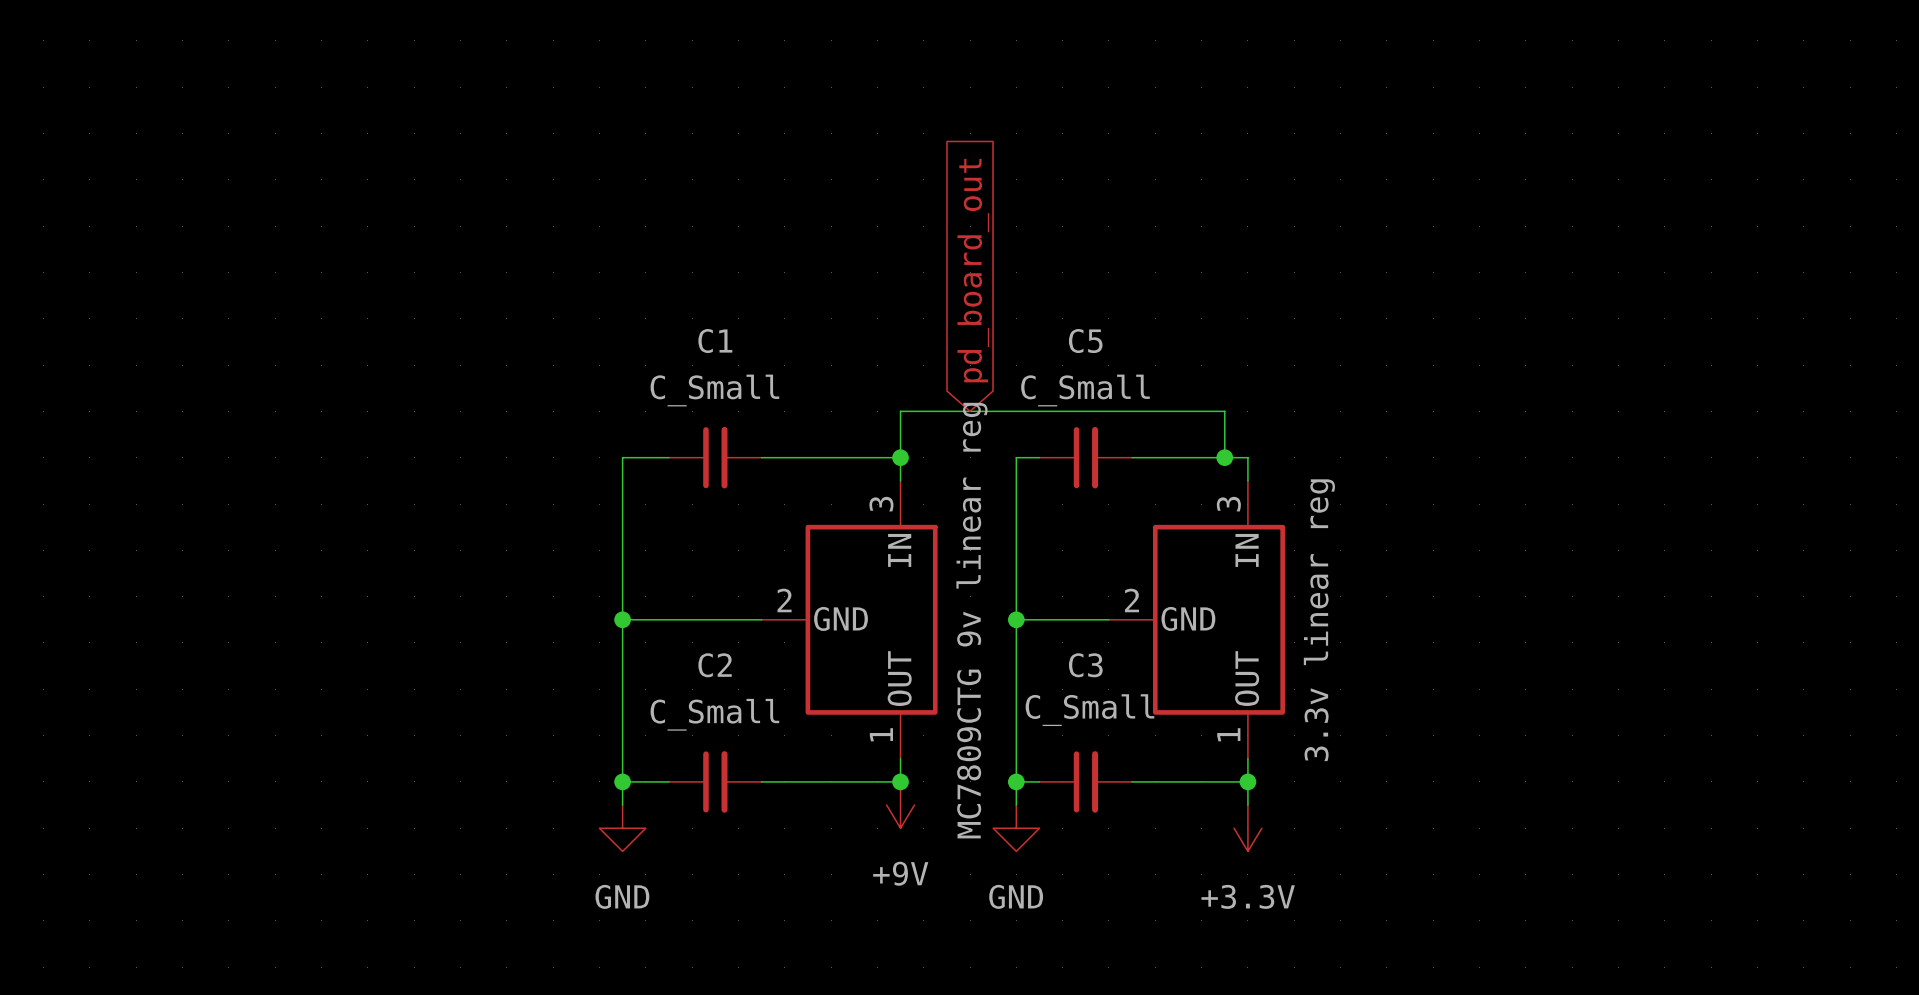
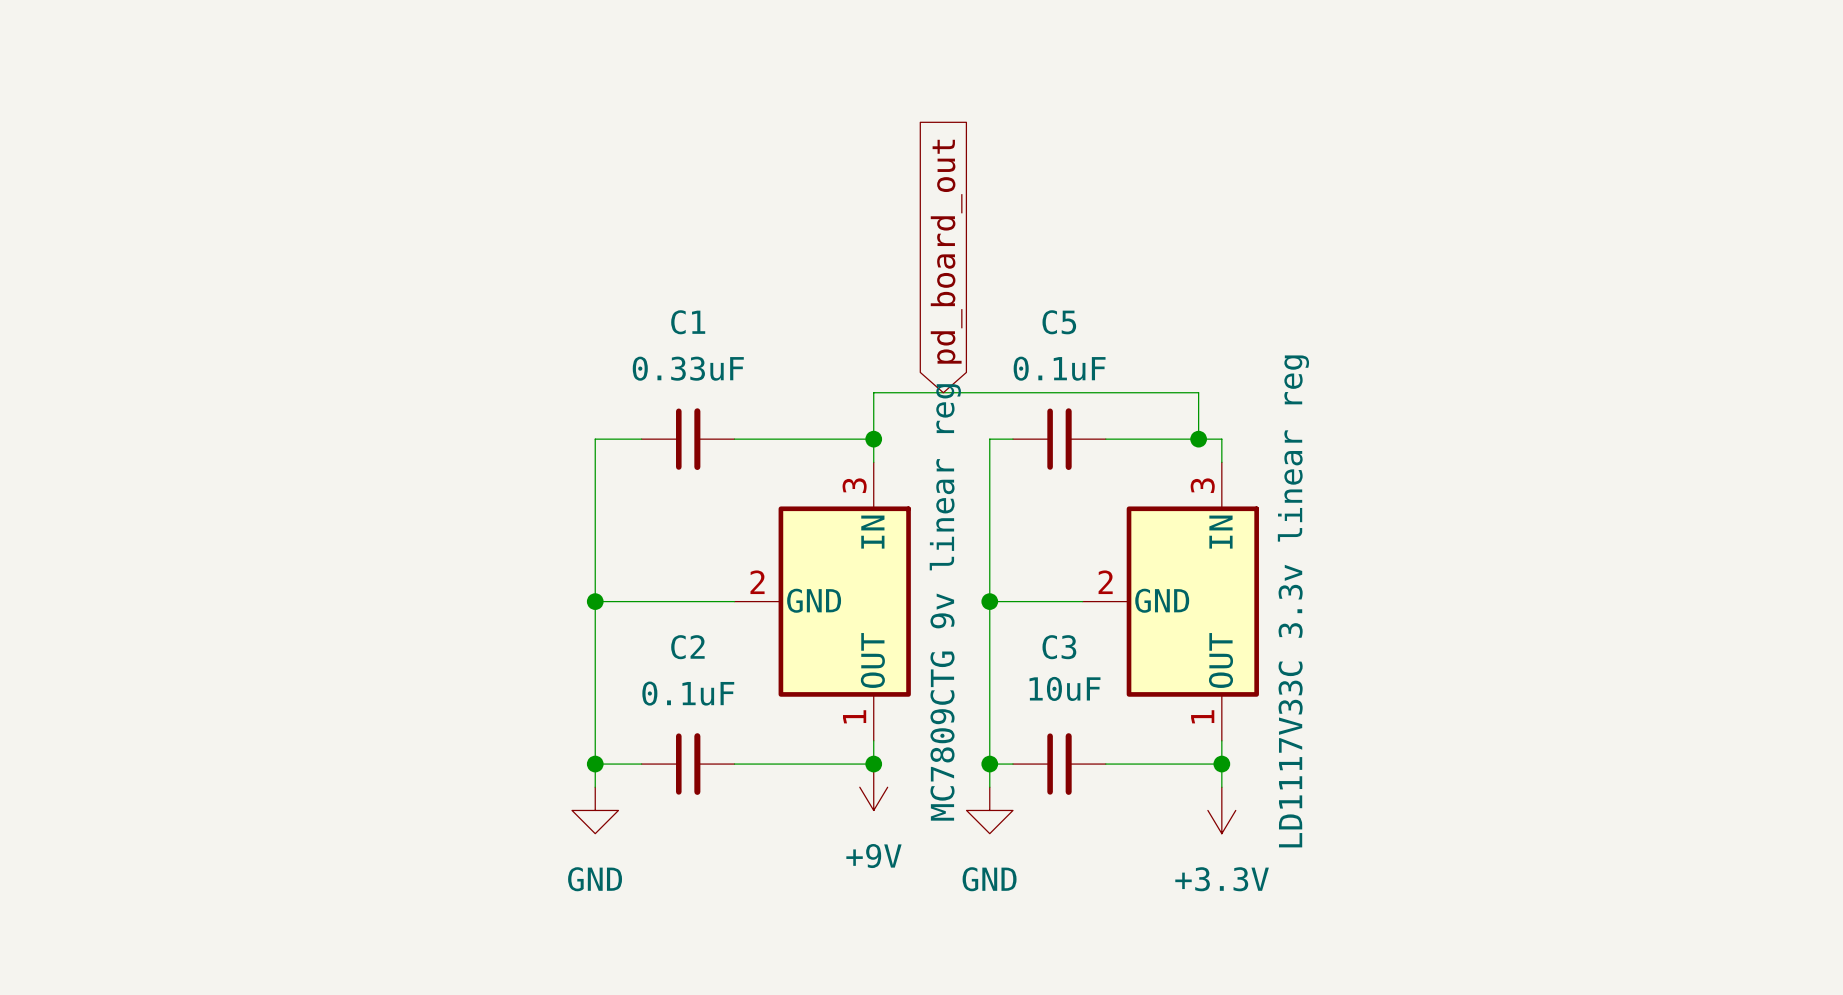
C1 value: C_Small (714, 390) -> 0.33uF (688, 368)
C5 value: C_Small (1085, 390) -> 0.1uF (1059, 368)
part value: 3.3v linear reg (1319, 620) -> LD1117V33C 3.3v linear reg (1293, 601)
C3 value: C_Small (1089, 710) -> 10uF (1065, 688)
C2 value: C_Small (714, 714) -> 0.1uF (688, 693)

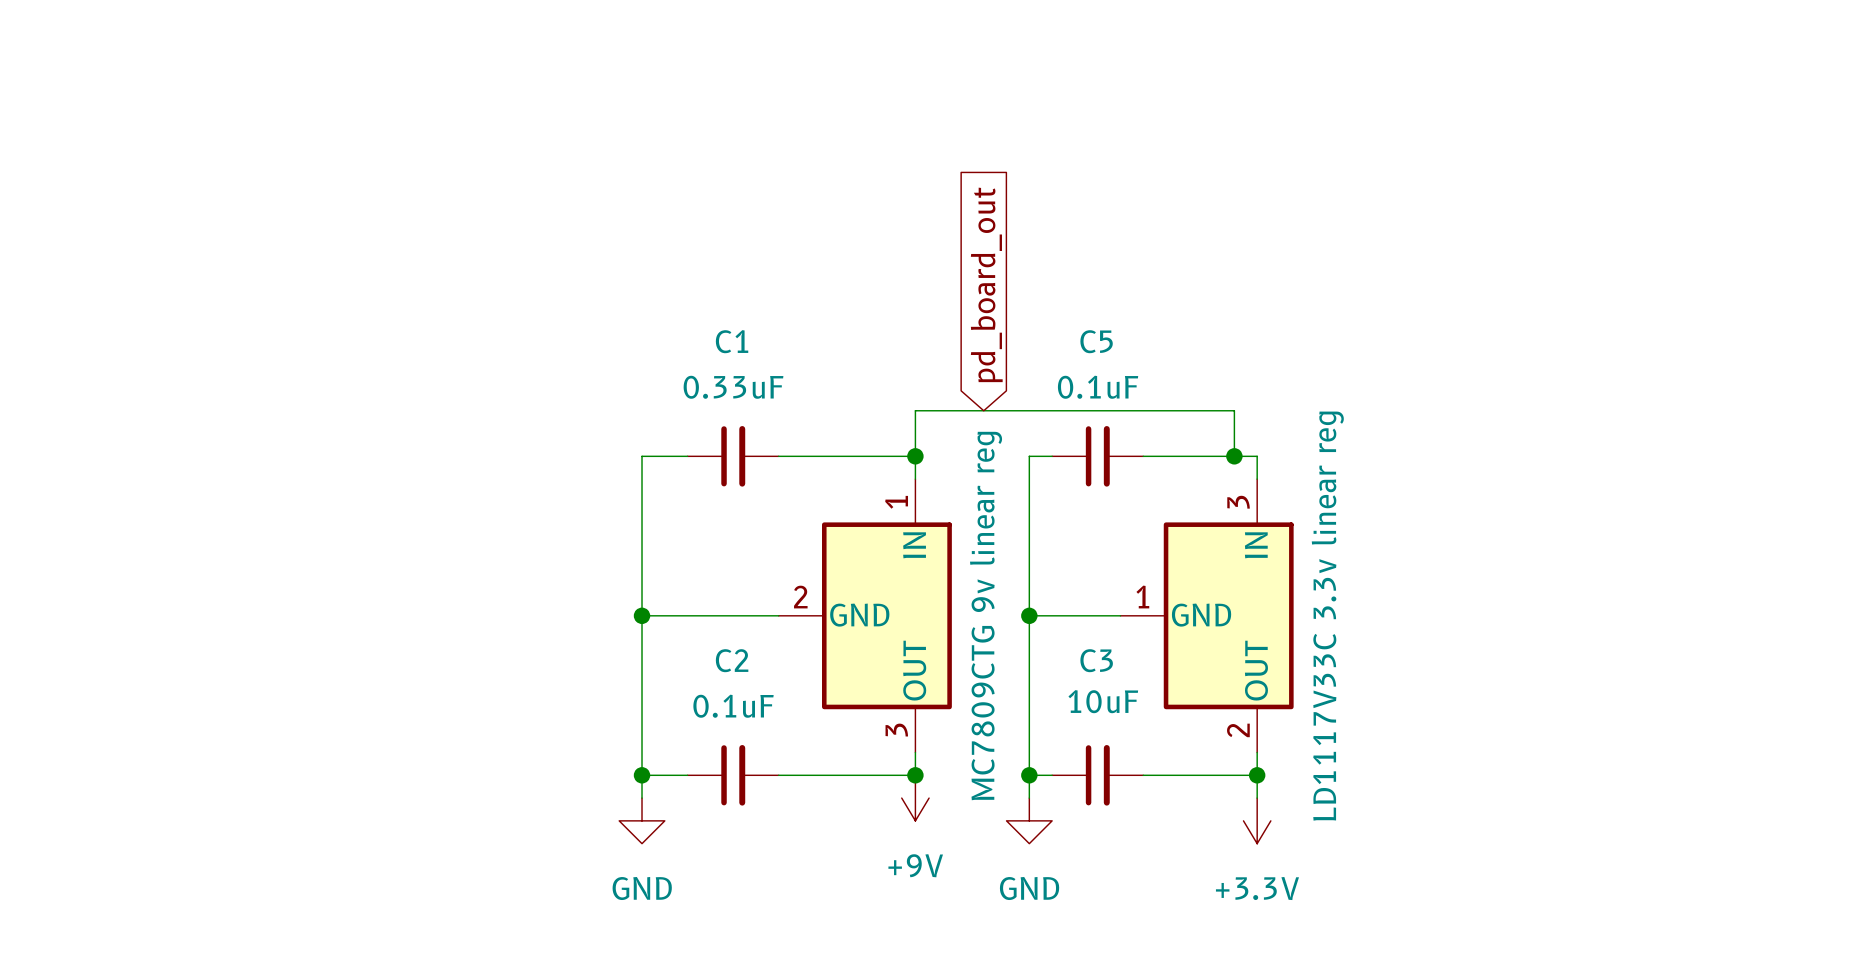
part pin number: 3 (854, 485) -> 1 (896, 502)
part pin number: 2 (1105, 582) -> 1 (1142, 597)
part pin number: 1 (854, 716) -> 3 (896, 730)
part pin number: 1 (1202, 716) -> 2 (1238, 730)

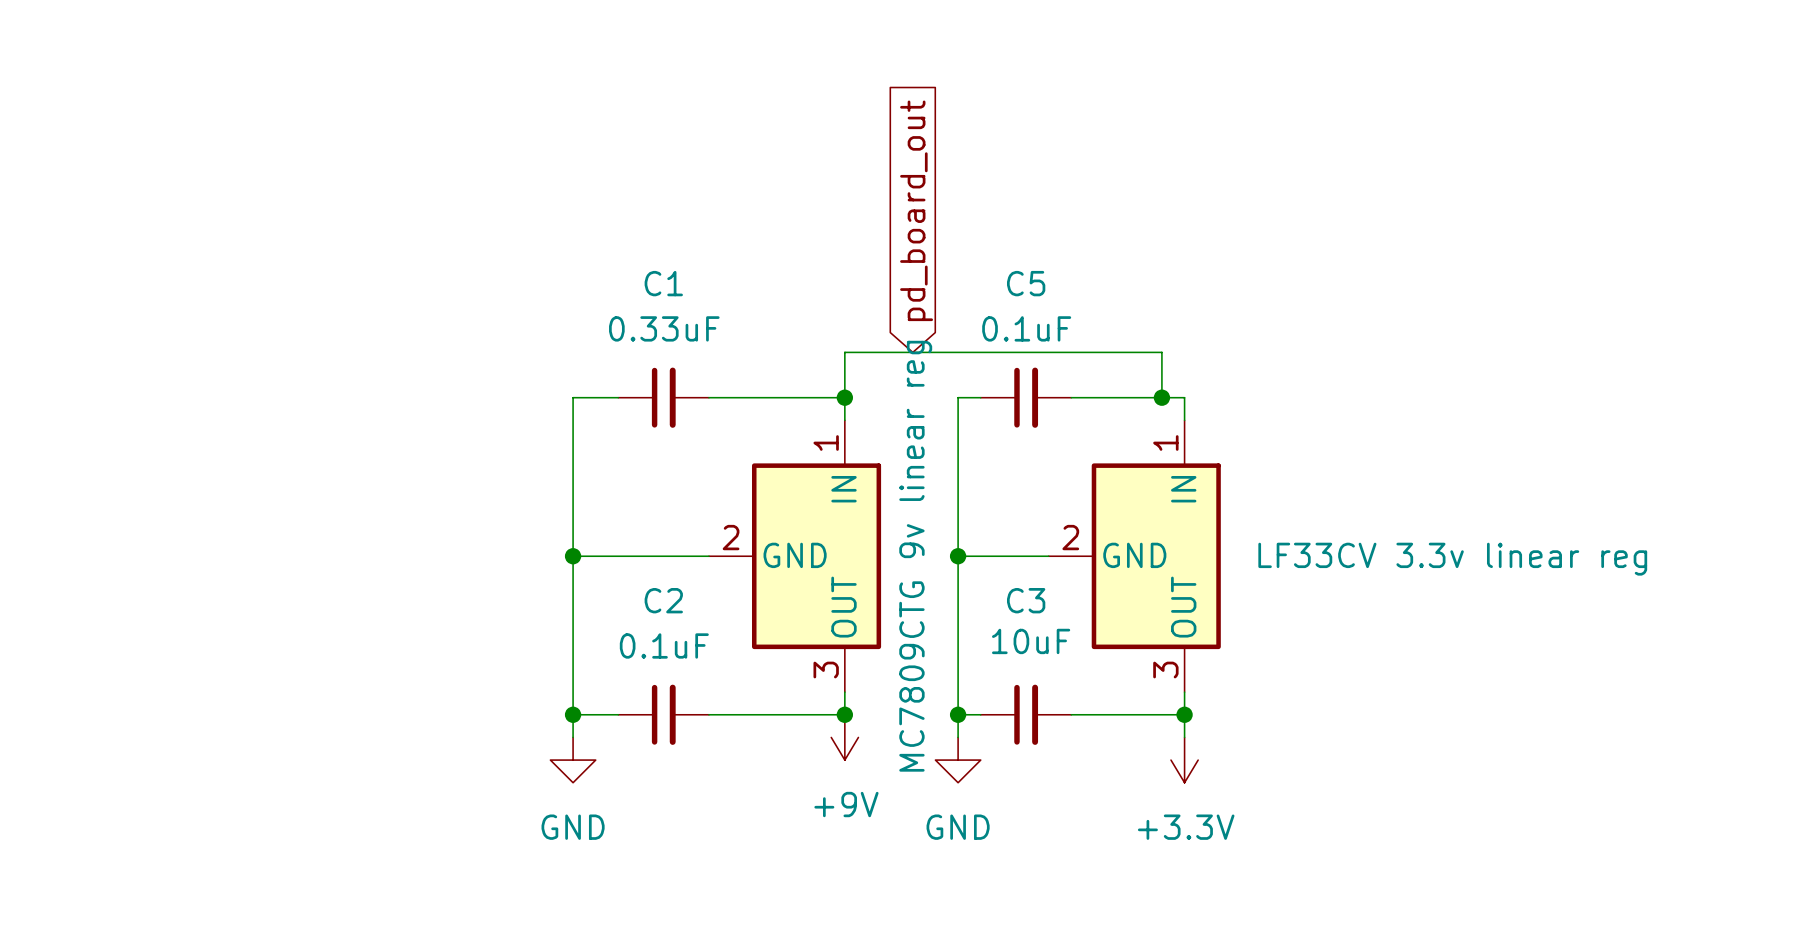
part pin number: 3 (1238, 502) -> 1 (1165, 442)
part pin number: 1 (1142, 597) -> 2 (1070, 537)
part value: LD1117V33C 3.3v linear reg (1327, 616) -> LF33CV 3.3v linear reg (1452, 559)
part pin number: 2 (1238, 730) -> 3 (1165, 670)

